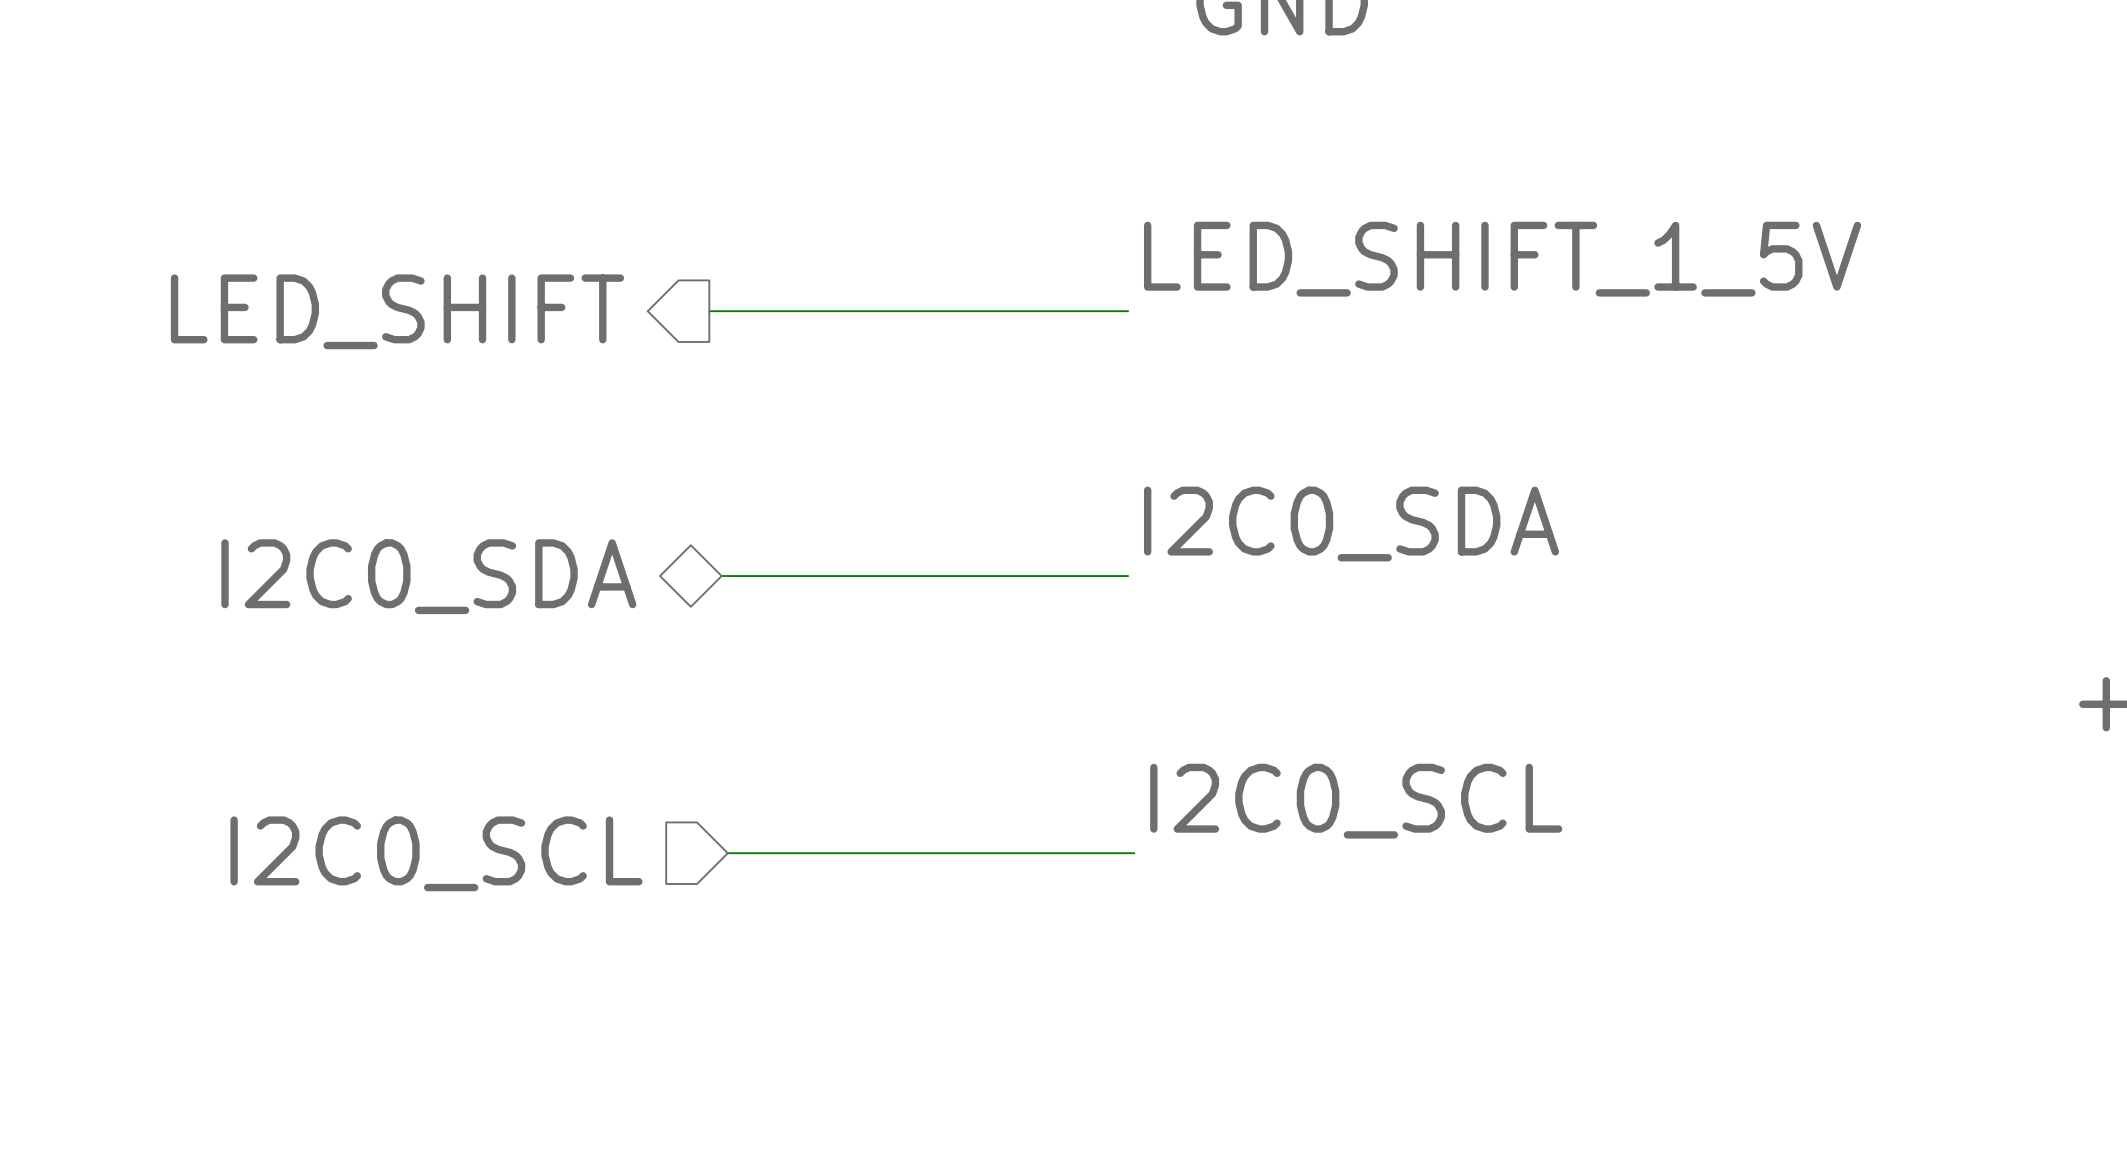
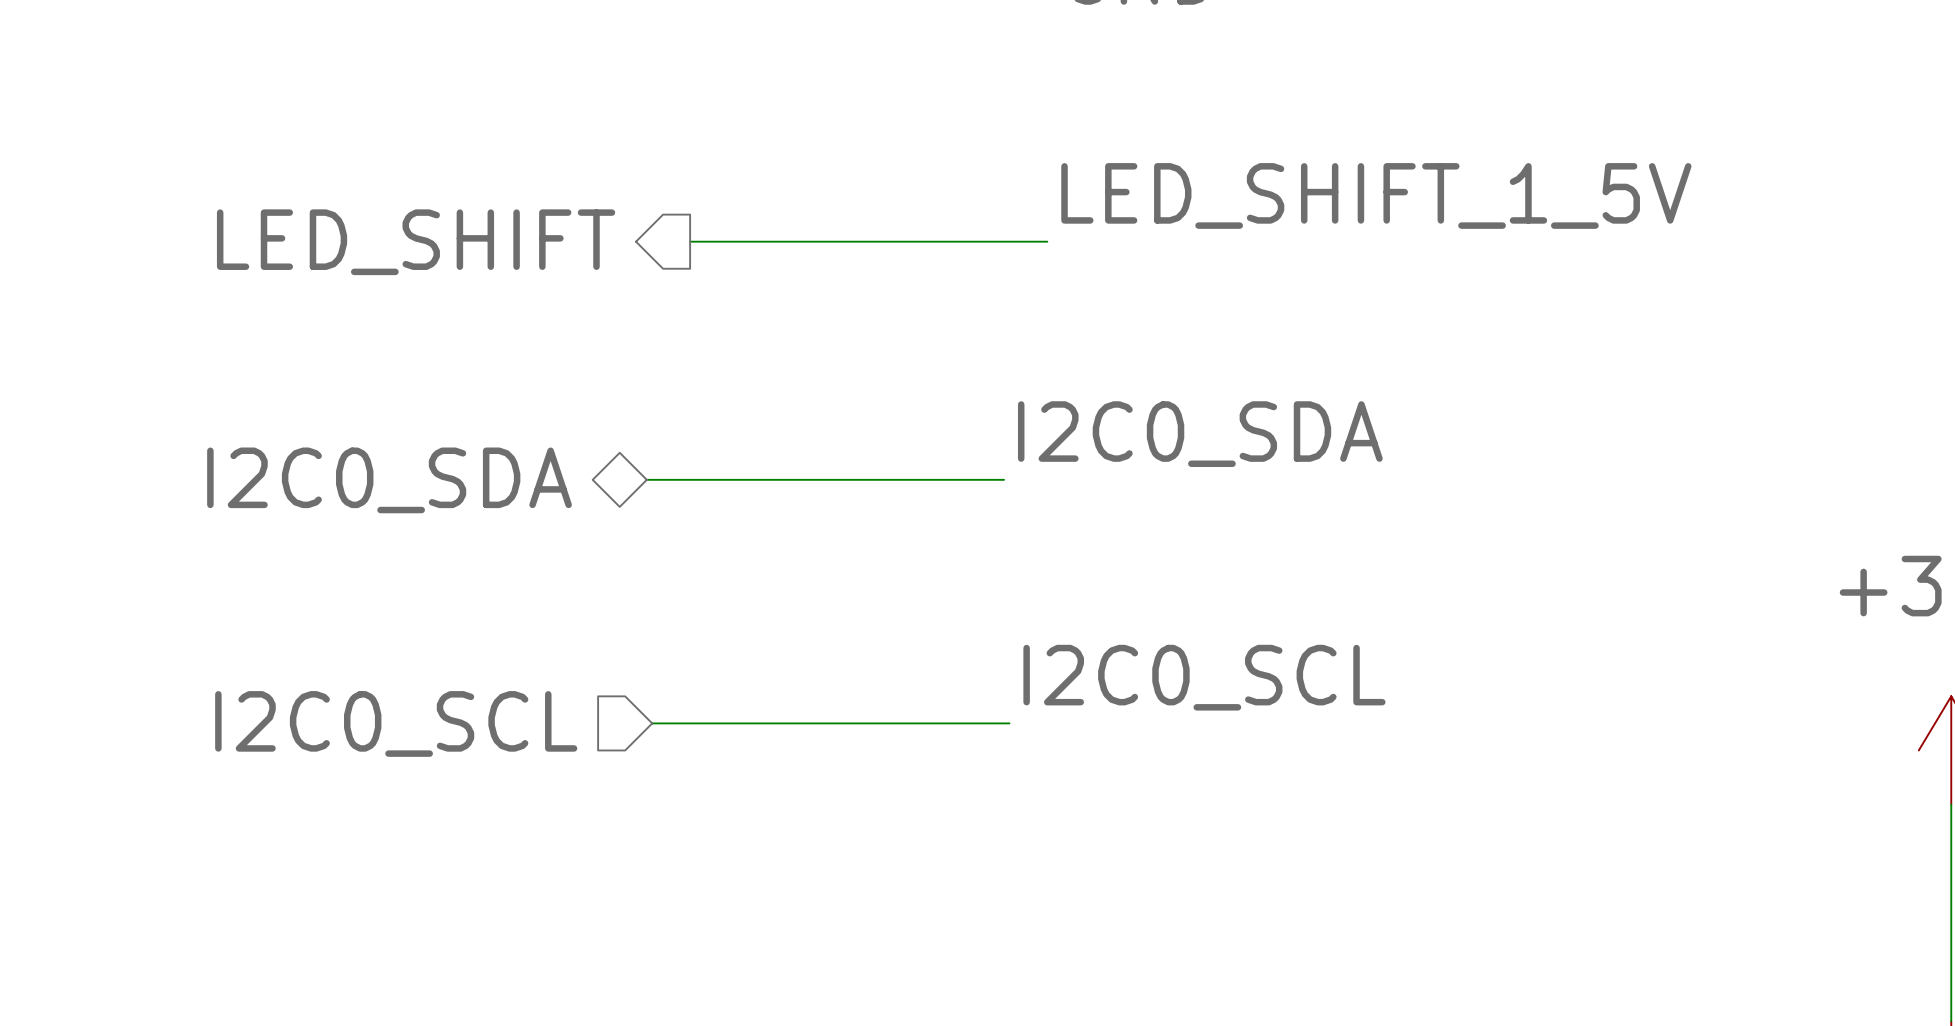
label position: LED_SHIFT_1_5V (1502, 259) -> LED_SHIFT_1_5V (1376, 195)
wire: none -> (690, 241) (1047, 241)
hierarchical label position: LED_SHIFT (397, 311) -> LED_SHIFT (416, 242)
wire: (709, 311) (1128, 311) -> none

